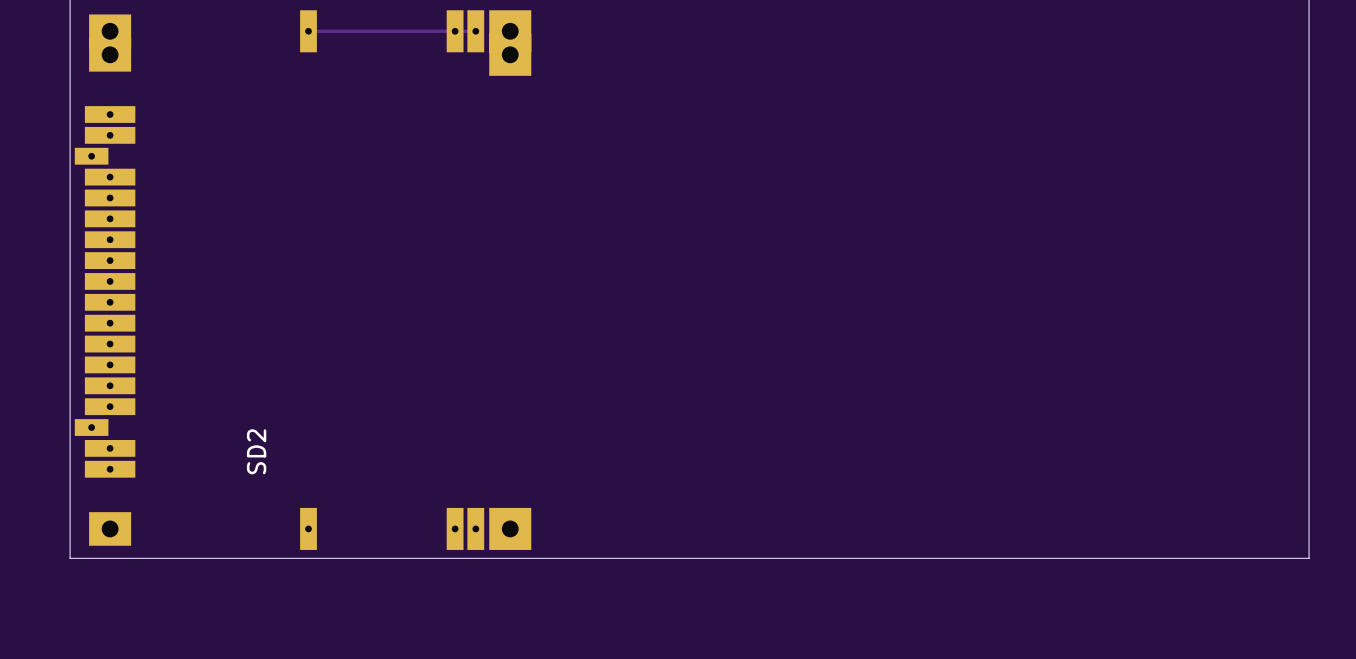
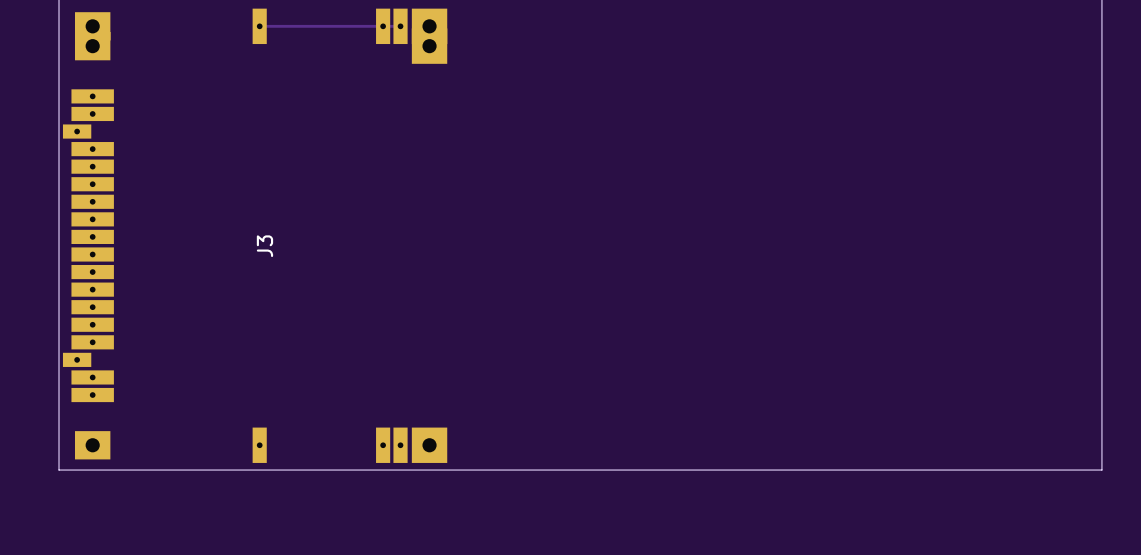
J3 name: none -> J3 (264, 246)
J3 value: SD2 (256, 451) -> none

